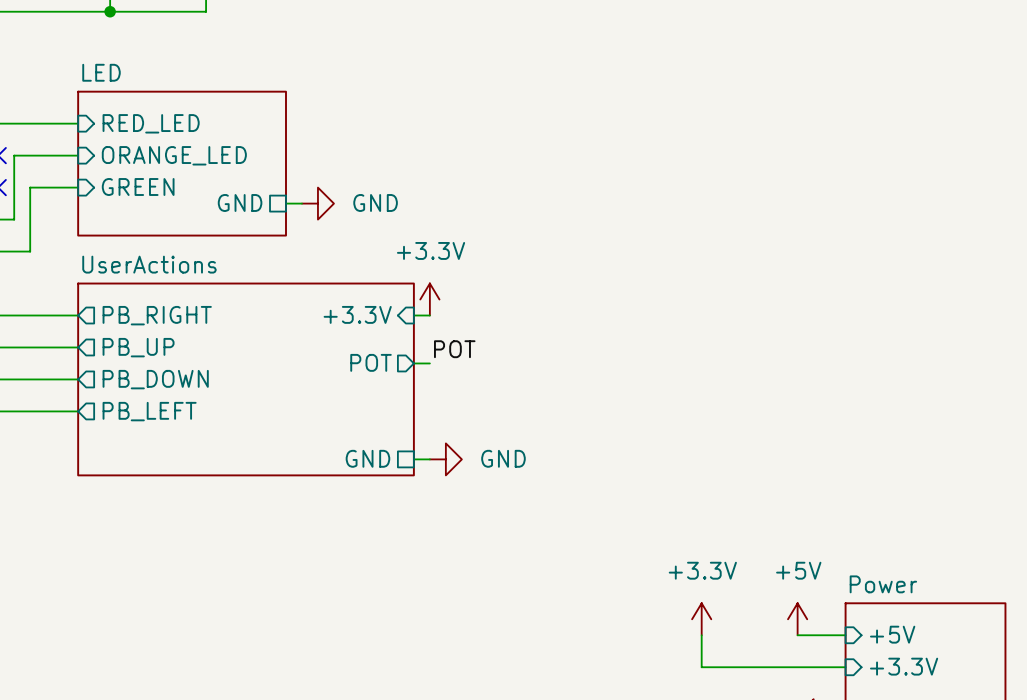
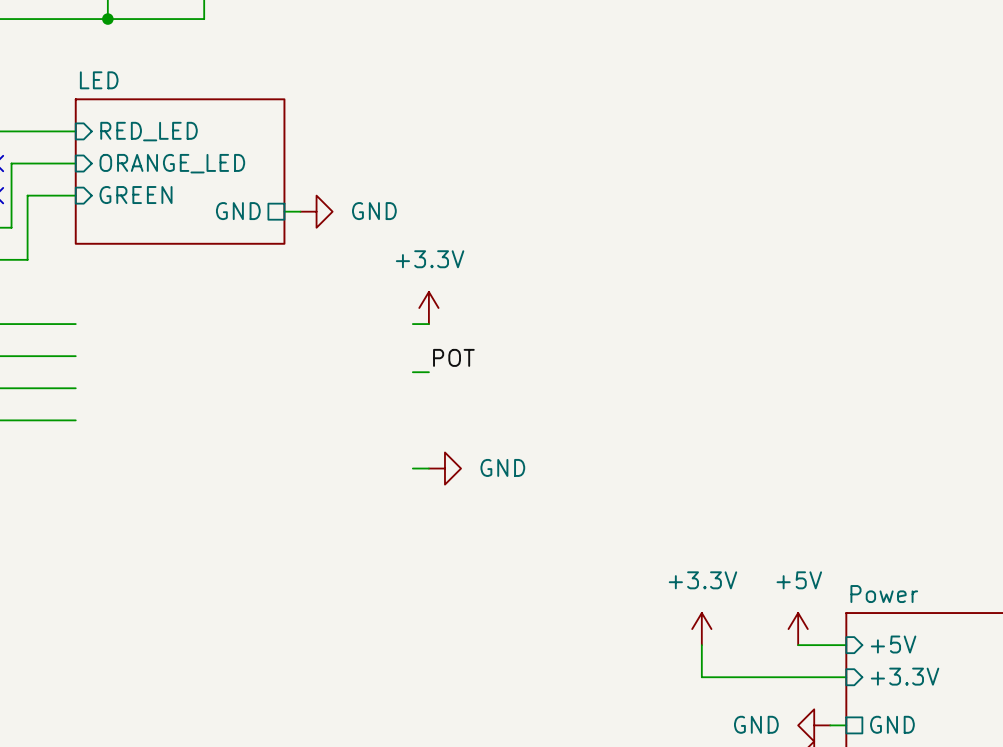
sheet pin: +3.3V (357, 314) -> none
sheet pin: PB_RIGHT (157, 315) -> none
sheet pin: PB_UP (138, 347) -> none
sheet pin: POT (371, 362) -> none
sheet pin: PB_DOWN (155, 379) -> none
sheet UserActions: (246, 379) -> none
sheet pin: PB_LEFT (149, 411) -> none
sheet pin: GND (367, 458) -> none

